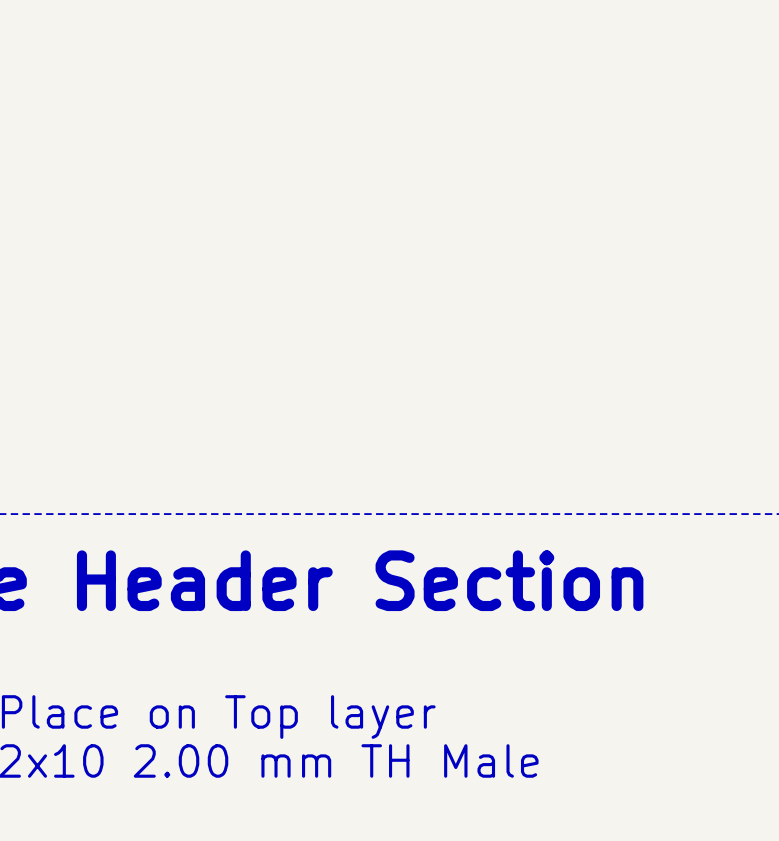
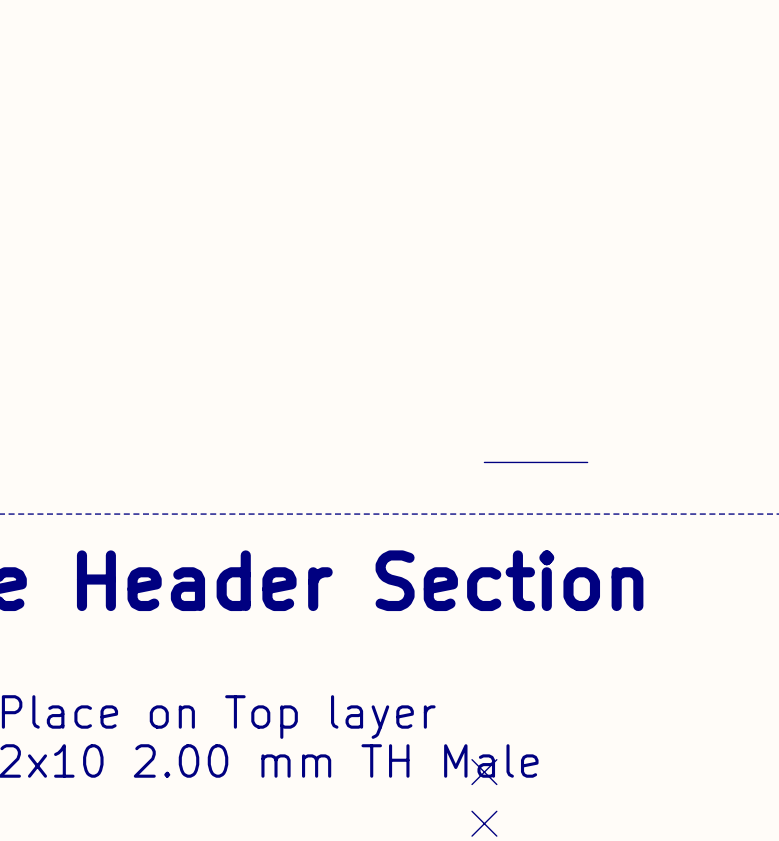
wire: none -> (484, 462) (587, 462)
no-connect mark: none -> (484, 772)
no-connect mark: none -> (484, 823)

